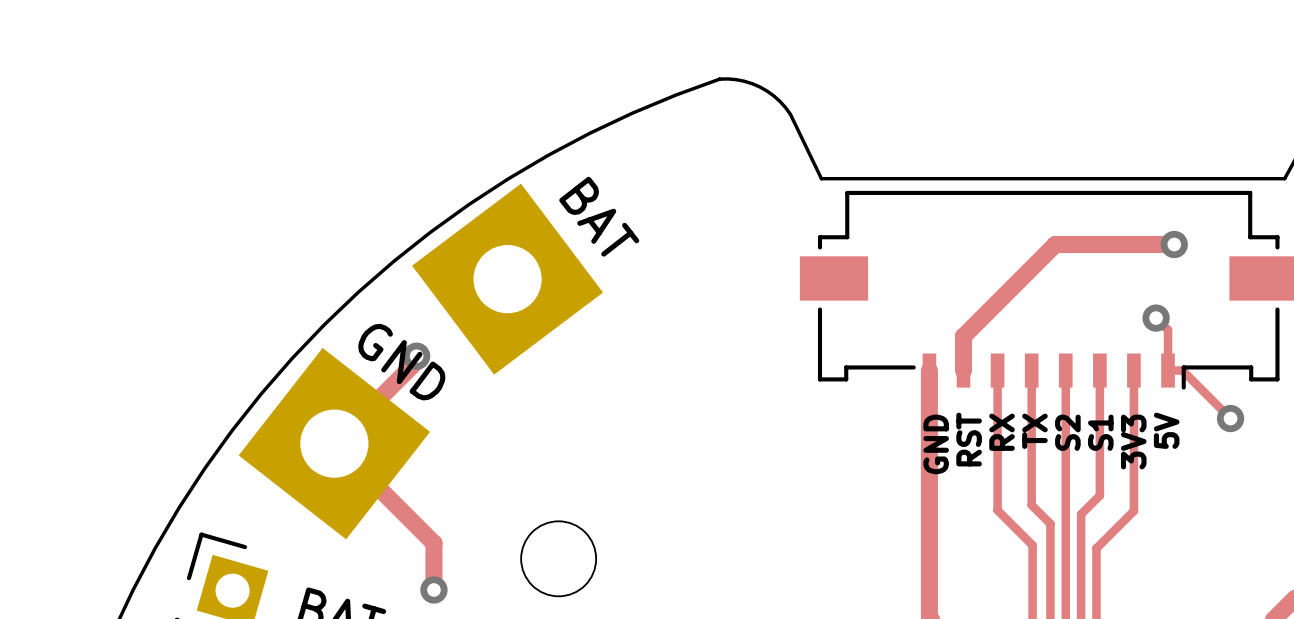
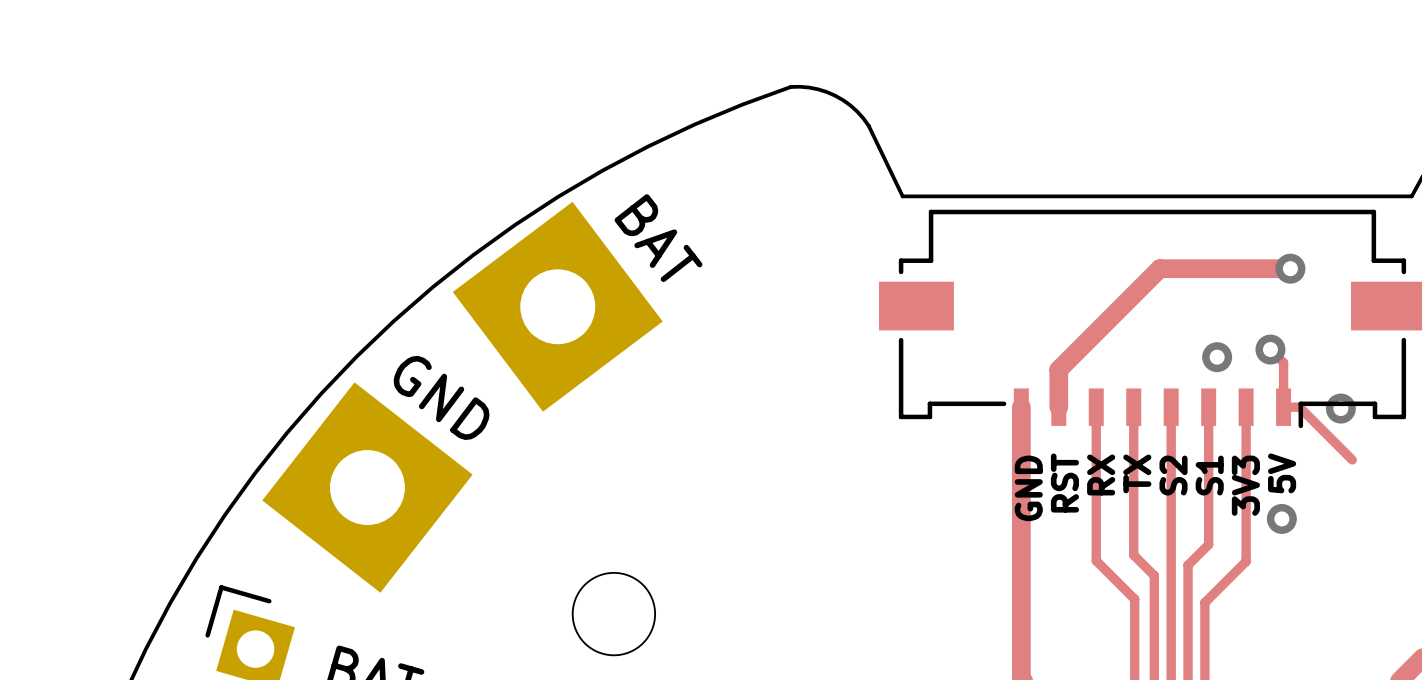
via: none -> (1217, 357)
track: (416, 356) (416, 361) (334, 443) (433, 543) (433, 589) -> none
via: (416, 356) -> none
via: none -> (1340, 408)
via: (1230, 418) -> none
via: none -> (1281, 518)
via: (433, 589) -> none

